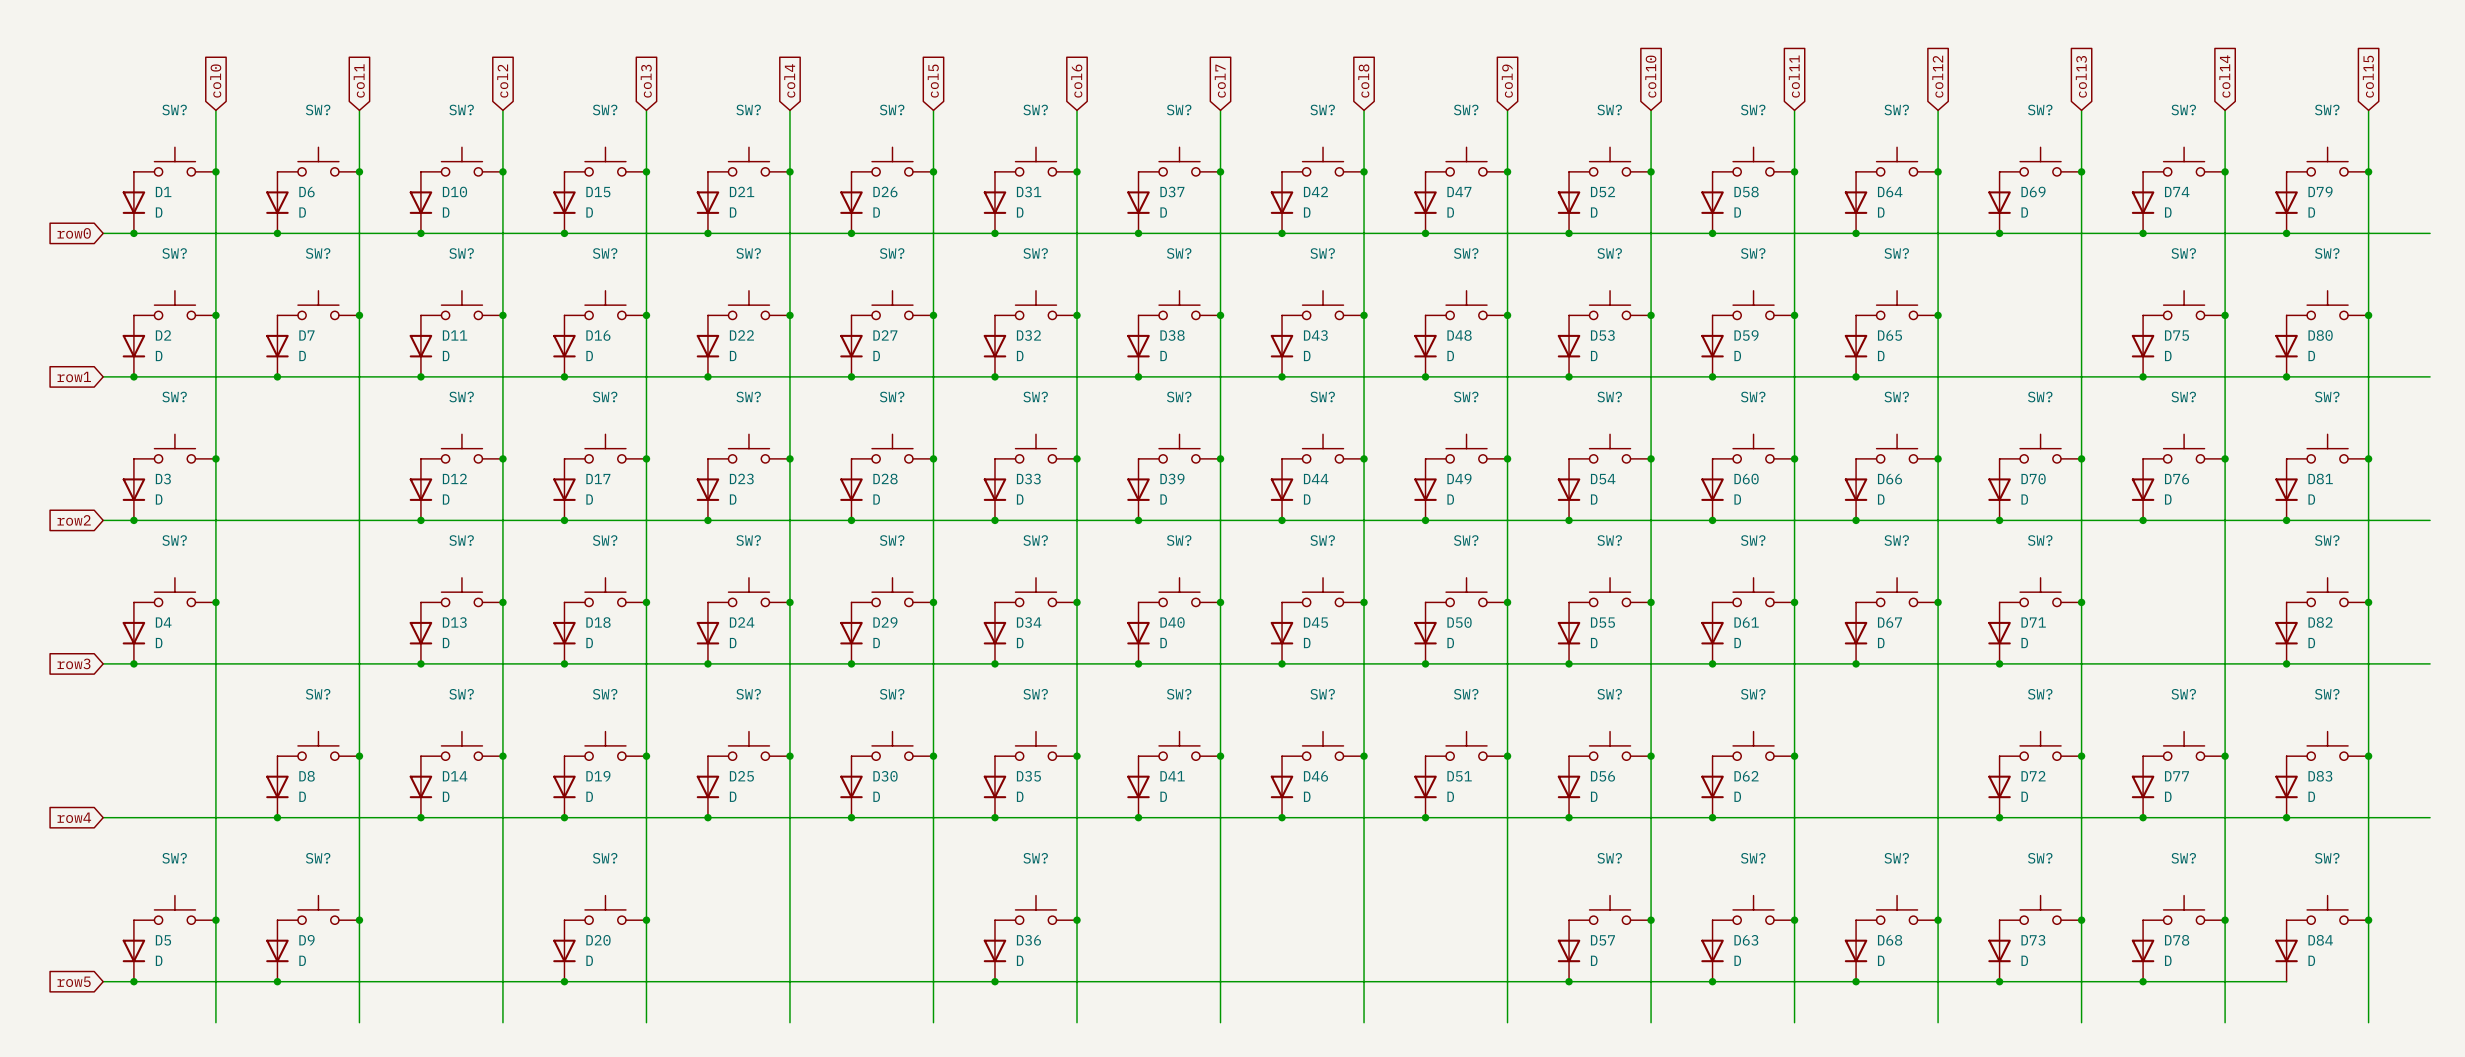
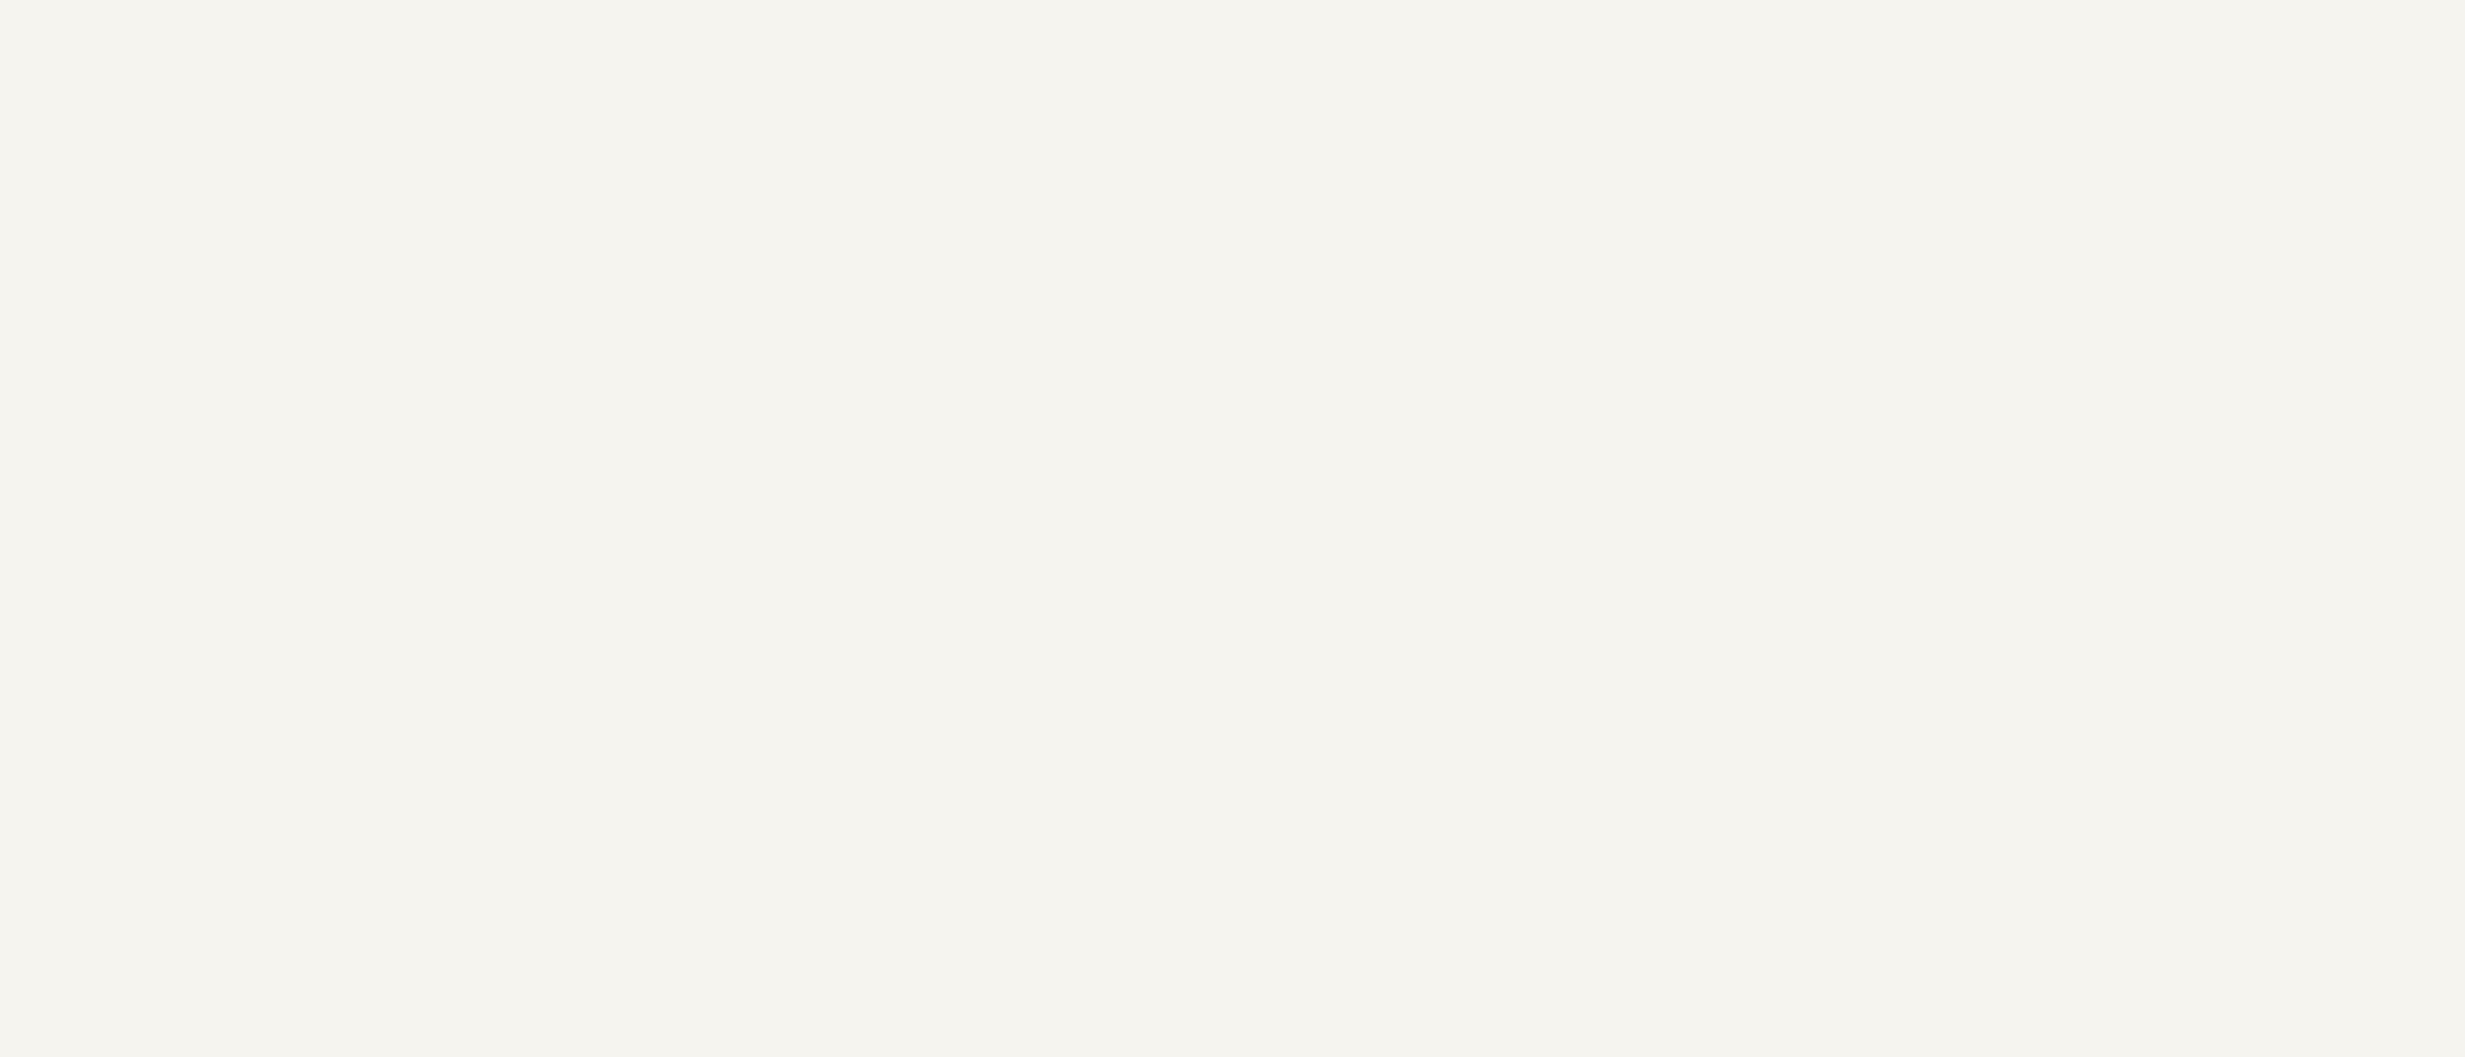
global label: col10 (1650, 76) -> none
global label: col11 (1794, 76) -> none
global label: col12 (1937, 76) -> none
global label: col13 (2081, 76) -> none
global label: col14 (2224, 76) -> none
global label: col15 (2368, 76) -> none
global label: col1 (359, 80) -> none
global label: col4 (789, 80) -> none
global label: col0 (215, 81) -> none
global label: col2 (502, 81) -> none
global label: col3 (646, 81) -> none
global label: col5 (933, 81) -> none
global label: col6 (1076, 81) -> none
global label: col7 (1220, 81) -> none
global label: col8 (1363, 81) -> none
global label: col9 (1507, 81) -> none
wire: (215, 110) (215, 1022) -> none
wire: (359, 110) (359, 1022) -> none
wire: (502, 110) (502, 1022) -> none
wire: (646, 110) (646, 1022) -> none
wire: (789, 110) (789, 1022) -> none
wire: (933, 110) (933, 1022) -> none
wire: (1077, 110) (1077, 1022) -> none
wire: (1220, 110) (1220, 1022) -> none
wire: (1364, 110) (1364, 1022) -> none
wire: (1507, 110) (1507, 1022) -> none
wire: (1651, 110) (1651, 1022) -> none
wire: (1794, 110) (1794, 1022) -> none
wire: (1938, 110) (1938, 1022) -> none
wire: (2081, 110) (2081, 1022) -> none
wire: (2225, 110) (2225, 1022) -> none
wire: (2368, 110) (2368, 1022) -> none
SW?: (174, 161) -> none
SW?: (318, 161) -> none
SW?: (461, 161) -> none
SW?: (605, 161) -> none
SW?: (748, 161) -> none
SW?: (892, 161) -> none
SW?: (1035, 161) -> none
SW?: (1179, 161) -> none
SW?: (1323, 161) -> none
SW?: (1466, 161) -> none
SW?: (1610, 161) -> none
SW?: (1753, 161) -> none
SW?: (1897, 161) -> none
SW?: (2040, 161) -> none
SW?: (2184, 161) -> none
SW?: (2327, 161) -> none
junction: (215, 171) -> none
junction: (359, 171) -> none
junction: (502, 171) -> none
junction: (646, 171) -> none
junction: (789, 171) -> none
junction: (933, 171) -> none
junction: (1077, 171) -> none
junction: (1220, 171) -> none
junction: (1364, 171) -> none
junction: (1507, 171) -> none
junction: (1651, 171) -> none
junction: (1794, 171) -> none
junction: (1938, 171) -> none
junction: (2081, 171) -> none
junction: (2225, 171) -> none
junction: (2368, 171) -> none
D1: D (133, 202) -> none
D6: D (277, 202) -> none
D10: D (420, 202) -> none
D15: D (564, 202) -> none
D21: D (707, 202) -> none
D26: D (851, 202) -> none
D31: D (994, 202) -> none
D37: D (1138, 202) -> none
D42: D (1282, 202) -> none
D47: D (1425, 202) -> none
D52: D (1569, 202) -> none
D58: D (1712, 202) -> none
D64: D (1856, 202) -> none
D69: D (1999, 202) -> none
D74: D (2143, 202) -> none
D79: D (2286, 202) -> none
global label: row0 (74, 233) -> none
wire: (103, 233) (2430, 233) -> none
junction: (133, 233) -> none
junction: (277, 233) -> none
junction: (420, 233) -> none
junction: (564, 233) -> none
junction: (707, 233) -> none
junction: (851, 233) -> none
junction: (994, 233) -> none
junction: (1138, 233) -> none
junction: (1282, 233) -> none
junction: (1425, 233) -> none
junction: (1569, 233) -> none
junction: (1712, 233) -> none
junction: (1856, 233) -> none
junction: (1999, 233) -> none
junction: (2143, 233) -> none
junction: (2286, 233) -> none
SW?: (174, 305) -> none
SW?: (318, 305) -> none
SW?: (461, 305) -> none
SW?: (605, 305) -> none
SW?: (748, 305) -> none
SW?: (892, 305) -> none
SW?: (1035, 305) -> none
SW?: (1179, 305) -> none
SW?: (1323, 305) -> none
SW?: (1466, 305) -> none
SW?: (1610, 305) -> none
SW?: (1753, 305) -> none
SW?: (1897, 305) -> none
SW?: (2184, 305) -> none
SW?: (2327, 305) -> none
junction: (215, 315) -> none
junction: (359, 315) -> none
junction: (502, 315) -> none
junction: (646, 315) -> none
junction: (789, 315) -> none
junction: (933, 315) -> none
junction: (1077, 315) -> none
junction: (1220, 315) -> none
junction: (1364, 315) -> none
junction: (1507, 315) -> none
junction: (1651, 315) -> none
junction: (1794, 315) -> none
junction: (1938, 315) -> none
junction: (2225, 315) -> none
junction: (2368, 315) -> none
D2: D (133, 346) -> none
D7: D (277, 346) -> none
D11: D (420, 346) -> none
D16: D (564, 346) -> none
D22: D (707, 346) -> none
D27: D (851, 346) -> none
D32: D (994, 346) -> none
D38: D (1138, 346) -> none
D43: D (1282, 346) -> none
D48: D (1425, 346) -> none
D53: D (1569, 346) -> none
D59: D (1712, 346) -> none
D65: D (1856, 346) -> none
D75: D (2143, 346) -> none
D80: D (2286, 346) -> none
global label: row1 (74, 376) -> none
wire: (103, 376) (2430, 376) -> none
junction: (133, 376) -> none
junction: (277, 376) -> none
junction: (420, 376) -> none
junction: (564, 376) -> none
junction: (707, 376) -> none
junction: (851, 376) -> none
junction: (994, 376) -> none
junction: (1138, 376) -> none
junction: (1282, 376) -> none
junction: (1425, 376) -> none
junction: (1569, 376) -> none
junction: (1712, 376) -> none
junction: (1856, 376) -> none
junction: (2143, 376) -> none
junction: (2286, 376) -> none
SW?: (174, 448) -> none
SW?: (461, 448) -> none
SW?: (605, 448) -> none
SW?: (748, 448) -> none
SW?: (892, 448) -> none
SW?: (1035, 448) -> none
SW?: (1179, 448) -> none
SW?: (1323, 448) -> none
SW?: (1466, 448) -> none
SW?: (1610, 448) -> none
SW?: (1753, 448) -> none
SW?: (1897, 448) -> none
SW?: (2040, 448) -> none
SW?: (2184, 448) -> none
SW?: (2327, 448) -> none
junction: (215, 458) -> none
junction: (502, 458) -> none
junction: (646, 458) -> none
junction: (789, 458) -> none
junction: (933, 458) -> none
junction: (1077, 458) -> none
junction: (1220, 458) -> none
junction: (1364, 458) -> none
junction: (1507, 458) -> none
junction: (1651, 458) -> none
junction: (1794, 458) -> none
junction: (1938, 458) -> none
junction: (2081, 458) -> none
junction: (2225, 458) -> none
junction: (2368, 458) -> none
D3: D (133, 489) -> none
D12: D (420, 489) -> none
D17: D (564, 489) -> none
D23: D (707, 489) -> none
D28: D (851, 489) -> none
D33: D (994, 489) -> none
D39: D (1138, 489) -> none
D44: D (1282, 489) -> none
D49: D (1425, 489) -> none
D54: D (1569, 489) -> none
D60: D (1712, 489) -> none
D66: D (1856, 489) -> none
D70: D (1999, 489) -> none
D76: D (2143, 489) -> none
D81: D (2286, 489) -> none
global label: row2 (74, 520) -> none
wire: (103, 520) (2430, 520) -> none
junction: (133, 520) -> none
junction: (420, 520) -> none
junction: (564, 520) -> none
junction: (707, 520) -> none
junction: (851, 520) -> none
junction: (994, 520) -> none
junction: (1138, 520) -> none
junction: (1282, 520) -> none
junction: (1425, 520) -> none
junction: (1569, 520) -> none
junction: (1712, 520) -> none
junction: (1856, 520) -> none
junction: (1999, 520) -> none
junction: (2143, 520) -> none
junction: (2286, 520) -> none
SW?: (174, 592) -> none
SW?: (461, 592) -> none
SW?: (605, 592) -> none
SW?: (748, 592) -> none
SW?: (892, 592) -> none
SW?: (1035, 592) -> none
SW?: (1179, 592) -> none
SW?: (1323, 592) -> none
SW?: (1466, 592) -> none
SW?: (1610, 592) -> none
SW?: (1753, 592) -> none
SW?: (1897, 592) -> none
SW?: (2040, 592) -> none
SW?: (2327, 592) -> none
junction: (215, 602) -> none
junction: (502, 602) -> none
junction: (646, 602) -> none
junction: (789, 602) -> none
junction: (933, 602) -> none
junction: (1077, 602) -> none
junction: (1220, 602) -> none
junction: (1364, 602) -> none
junction: (1507, 602) -> none
junction: (1651, 602) -> none
junction: (1794, 602) -> none
junction: (1938, 602) -> none
junction: (2081, 602) -> none
junction: (2368, 602) -> none
D4: D (133, 633) -> none
D13: D (420, 633) -> none
D18: D (564, 633) -> none
D24: D (707, 633) -> none
D29: D (851, 633) -> none
D34: D (994, 633) -> none
D40: D (1138, 633) -> none
D45: D (1282, 633) -> none
D50: D (1425, 633) -> none
D55: D (1569, 633) -> none
D61: D (1712, 633) -> none
D67: D (1856, 633) -> none
D71: D (1999, 633) -> none
D82: D (2286, 633) -> none
global label: row3 (73, 663) -> none
wire: (103, 663) (2430, 663) -> none
junction: (133, 663) -> none
junction: (420, 663) -> none
junction: (564, 663) -> none
junction: (707, 663) -> none
junction: (851, 663) -> none
junction: (994, 663) -> none
junction: (1138, 663) -> none
junction: (1282, 663) -> none
junction: (1425, 663) -> none
junction: (1569, 663) -> none
junction: (1712, 663) -> none
junction: (1856, 663) -> none
junction: (1999, 663) -> none
junction: (2286, 663) -> none
SW?: (318, 745) -> none
SW?: (461, 745) -> none
SW?: (605, 745) -> none
SW?: (748, 745) -> none
SW?: (892, 745) -> none
SW?: (1035, 745) -> none
SW?: (1179, 745) -> none
SW?: (1323, 745) -> none
SW?: (1466, 745) -> none
SW?: (1610, 745) -> none
SW?: (1753, 745) -> none
SW?: (2040, 745) -> none
SW?: (2184, 745) -> none
SW?: (2327, 745) -> none
junction: (359, 756) -> none
junction: (502, 756) -> none
junction: (646, 756) -> none
junction: (789, 756) -> none
junction: (933, 756) -> none
junction: (1077, 756) -> none
junction: (1220, 756) -> none
junction: (1364, 756) -> none
junction: (1507, 756) -> none
junction: (1651, 756) -> none
junction: (1794, 756) -> none
junction: (2081, 756) -> none
junction: (2225, 756) -> none
junction: (2368, 756) -> none
D8: D (277, 786) -> none
D14: D (420, 786) -> none
D19: D (564, 786) -> none
D25: D (707, 786) -> none
D30: D (851, 786) -> none
D35: D (994, 786) -> none
D41: D (1138, 786) -> none
D46: D (1282, 786) -> none
D51: D (1425, 786) -> none
D56: D (1569, 786) -> none
D62: D (1712, 786) -> none
D72: D (1999, 786) -> none
D77: D (2143, 786) -> none
D83: D (2286, 786) -> none
global label: row4 (74, 817) -> none
wire: (103, 817) (2430, 817) -> none
junction: (277, 817) -> none
junction: (420, 817) -> none
junction: (564, 817) -> none
junction: (707, 817) -> none
junction: (851, 817) -> none
junction: (994, 817) -> none
junction: (1138, 817) -> none
junction: (1282, 817) -> none
junction: (1425, 817) -> none
junction: (1569, 817) -> none
junction: (1712, 817) -> none
junction: (1999, 817) -> none
junction: (2143, 817) -> none
junction: (2286, 817) -> none
SW?: (174, 909) -> none
SW?: (318, 909) -> none
SW?: (605, 909) -> none
SW?: (1035, 909) -> none
SW?: (1610, 909) -> none
SW?: (1753, 909) -> none
SW?: (1897, 909) -> none
SW?: (2040, 909) -> none
SW?: (2184, 909) -> none
SW?: (2327, 909) -> none
junction: (215, 920) -> none
junction: (359, 920) -> none
junction: (646, 920) -> none
junction: (1077, 920) -> none
junction: (1651, 920) -> none
junction: (1794, 920) -> none
junction: (1938, 920) -> none
junction: (2081, 920) -> none
junction: (2225, 920) -> none
junction: (2368, 920) -> none
D5: D (133, 950) -> none
D9: D (277, 950) -> none
D20: D (564, 950) -> none
D36: D (994, 950) -> none
D57: D (1569, 950) -> none
D63: D (1712, 950) -> none
D68: D (1856, 950) -> none
D73: D (1999, 950) -> none
D78: D (2143, 950) -> none
D84: D (2286, 950) -> none
global label: row5 (74, 981) -> none
wire: (103, 981) (2286, 981) -> none
junction: (133, 981) -> none
junction: (277, 981) -> none
junction: (564, 981) -> none
junction: (994, 981) -> none
junction: (1569, 981) -> none
junction: (1712, 981) -> none
junction: (1856, 981) -> none
junction: (1999, 981) -> none
junction: (2143, 981) -> none

